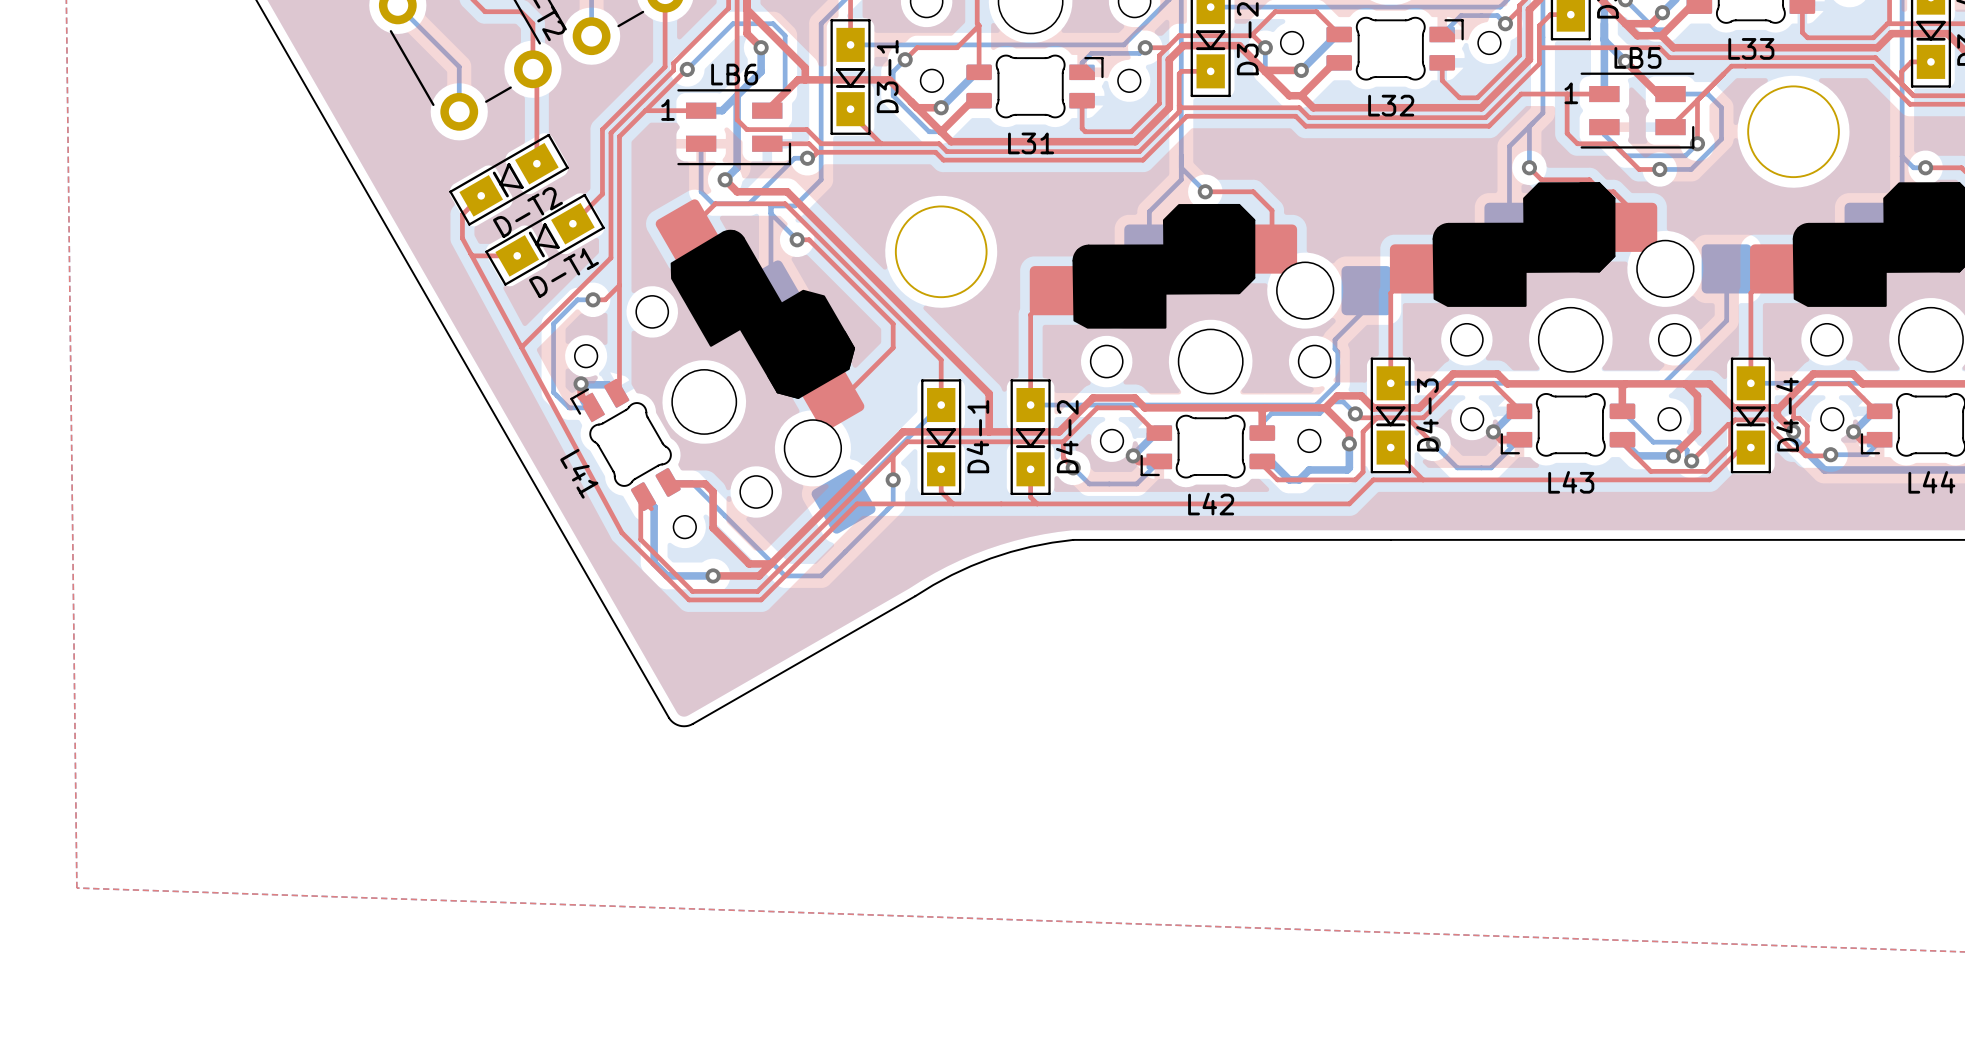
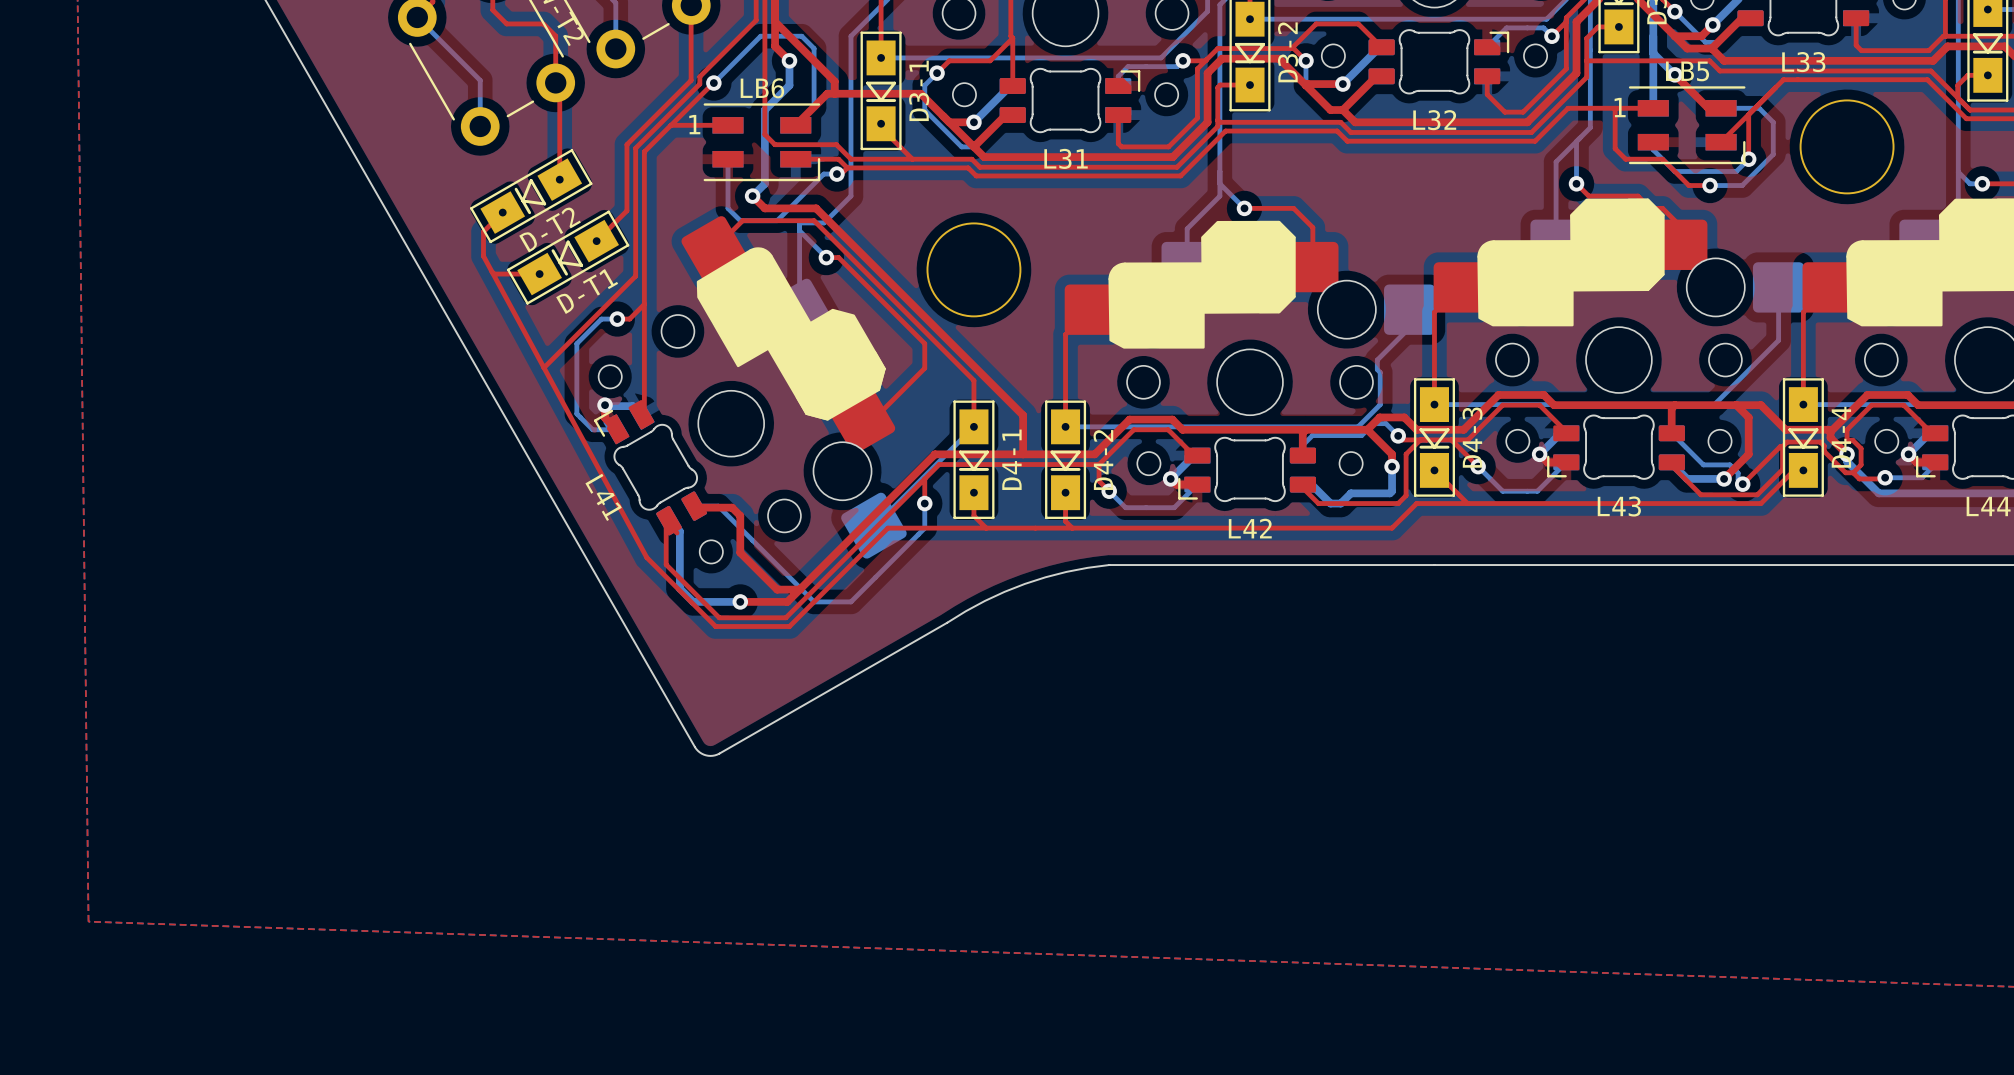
bottom track: (737, 95) (722, 110) (701, 110) -> none

